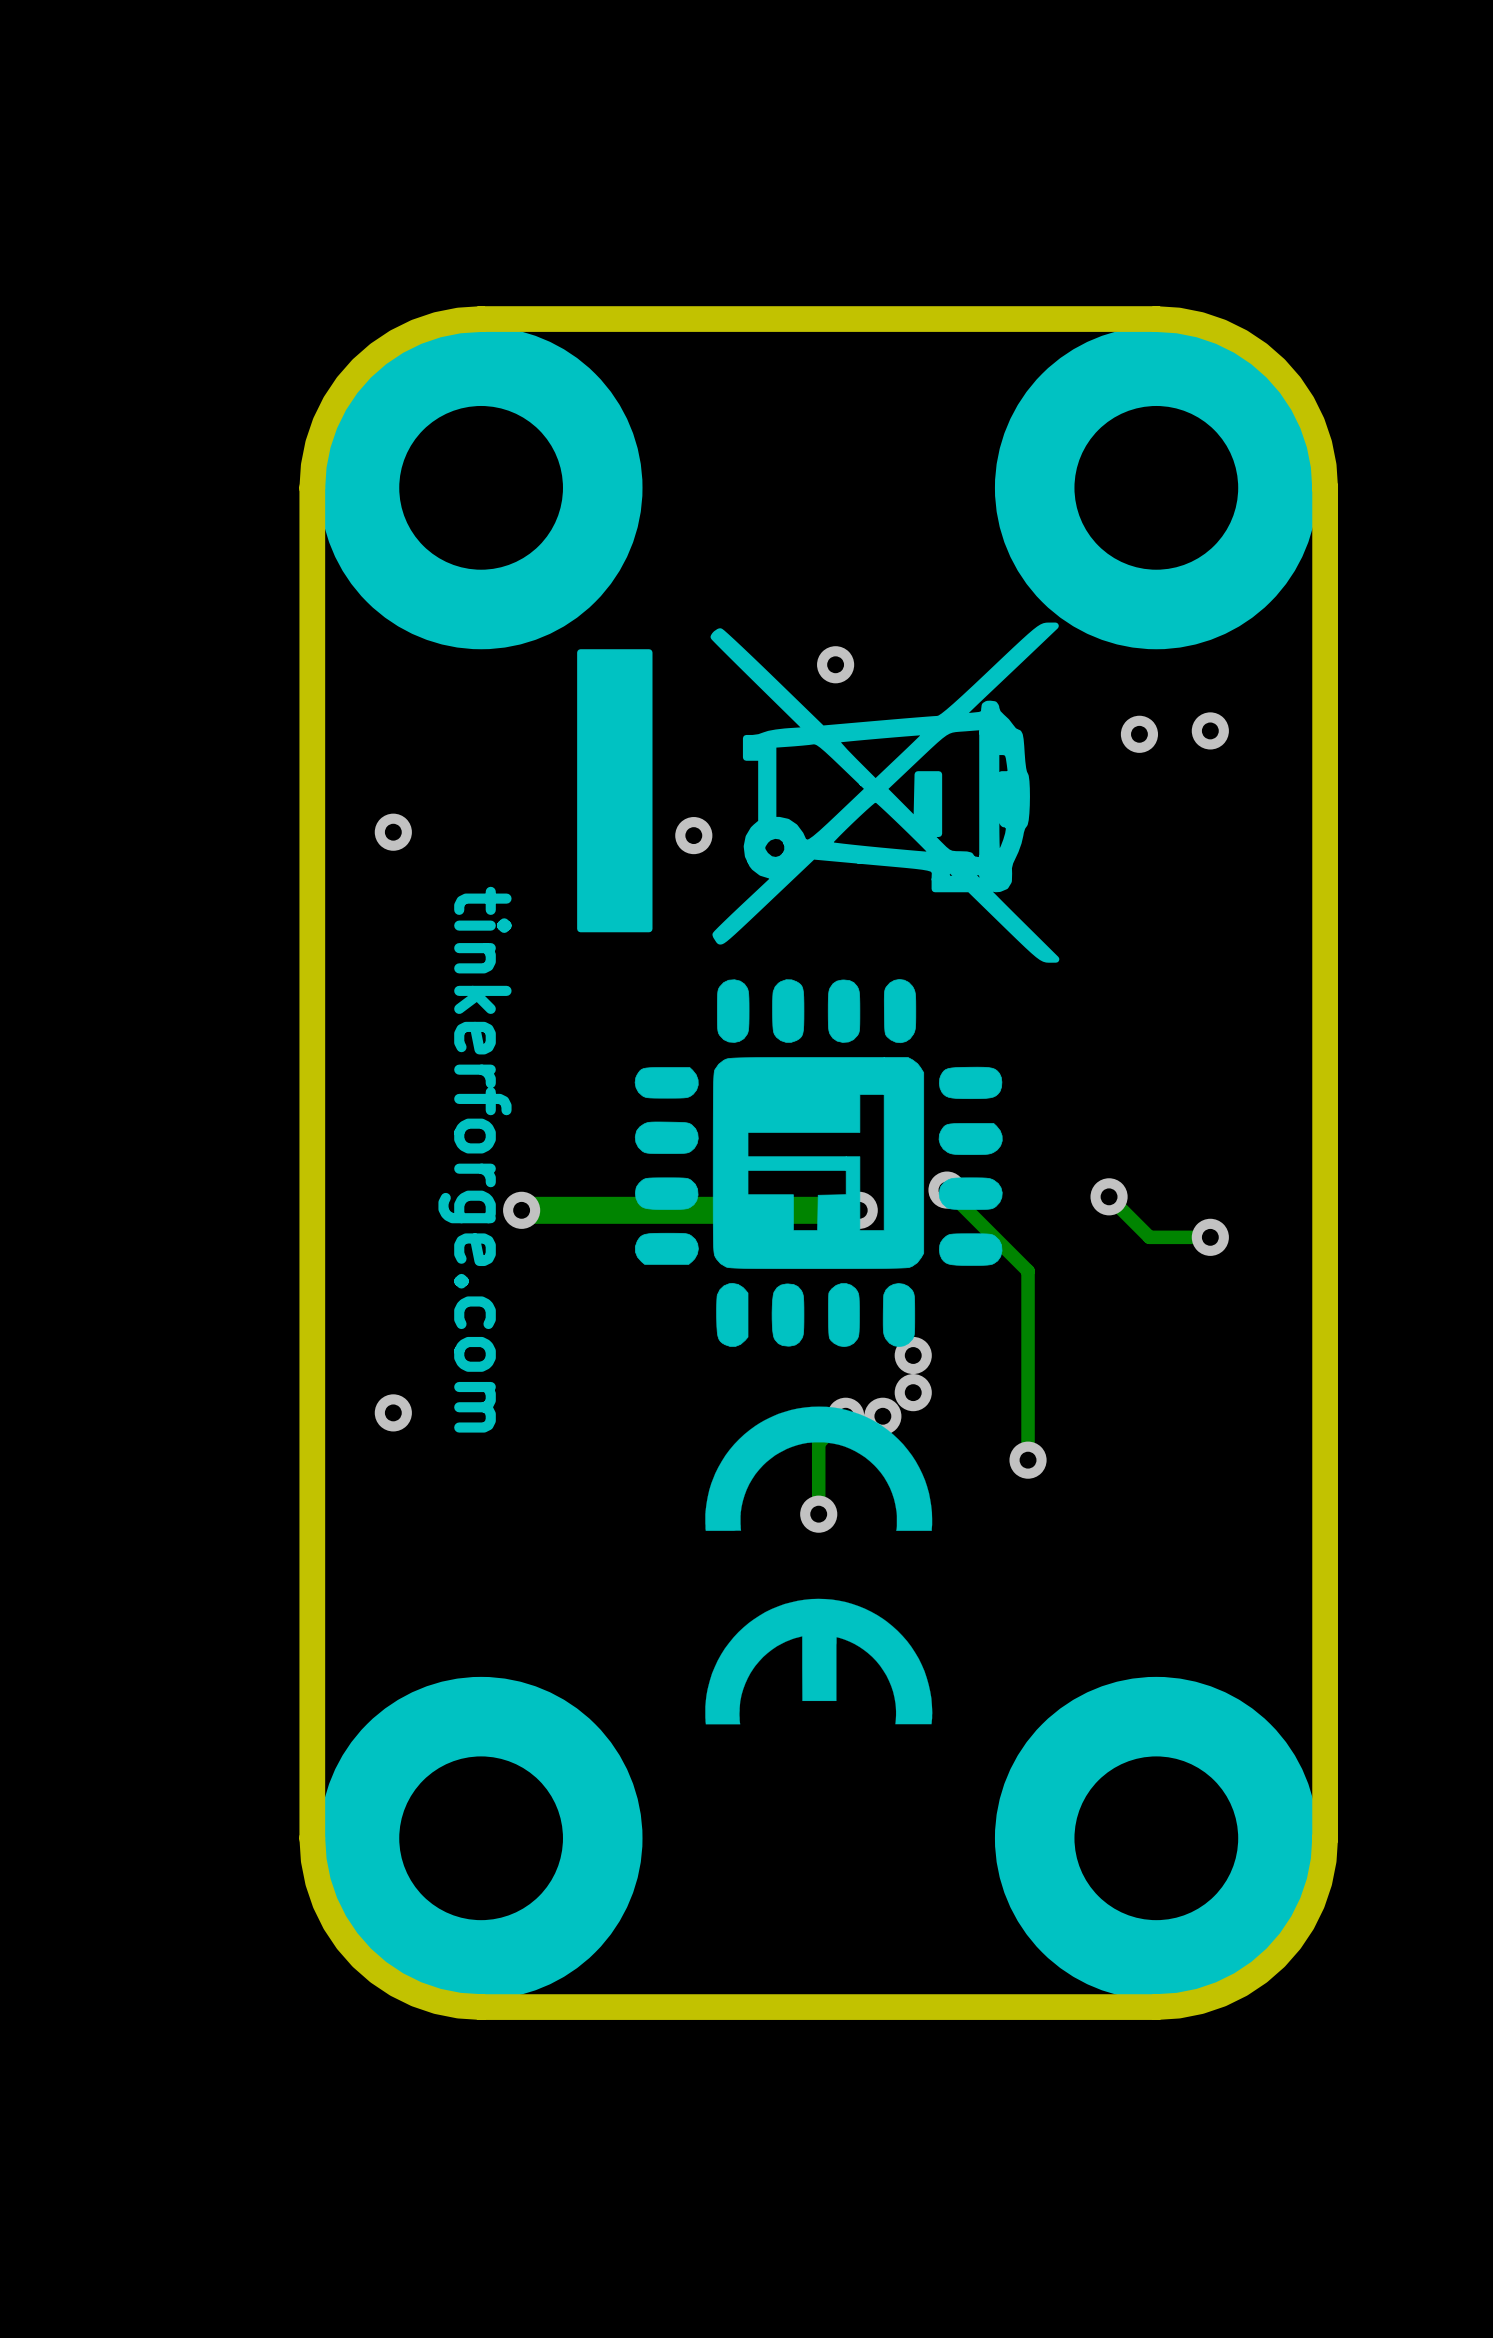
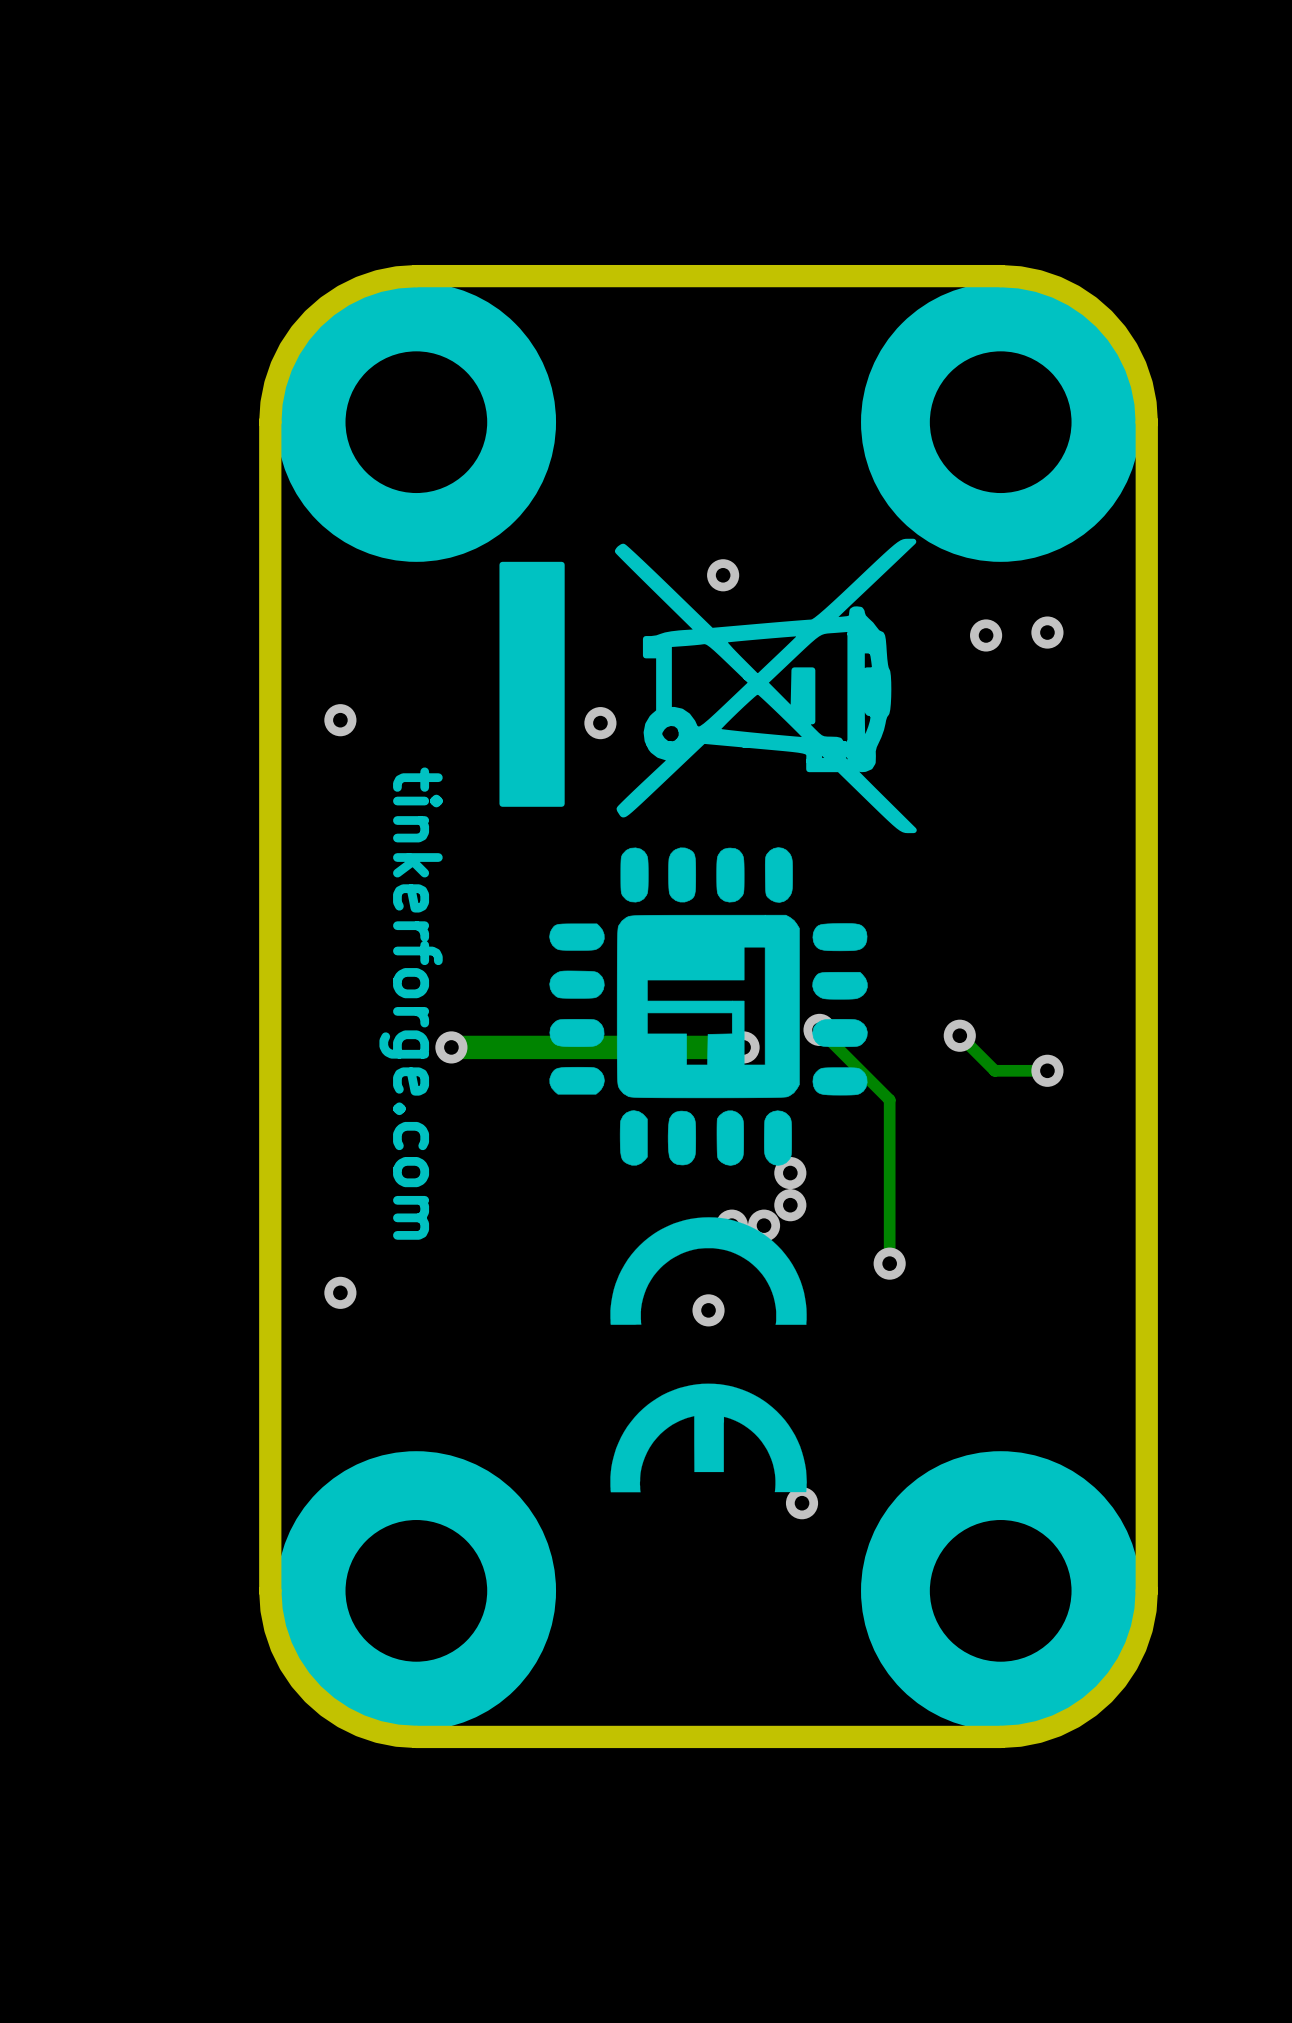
via position: (393, 1412) -> (340, 1292)
track: (845, 1416) (818, 1443) (818, 1514) -> none
via: none -> (802, 1503)

